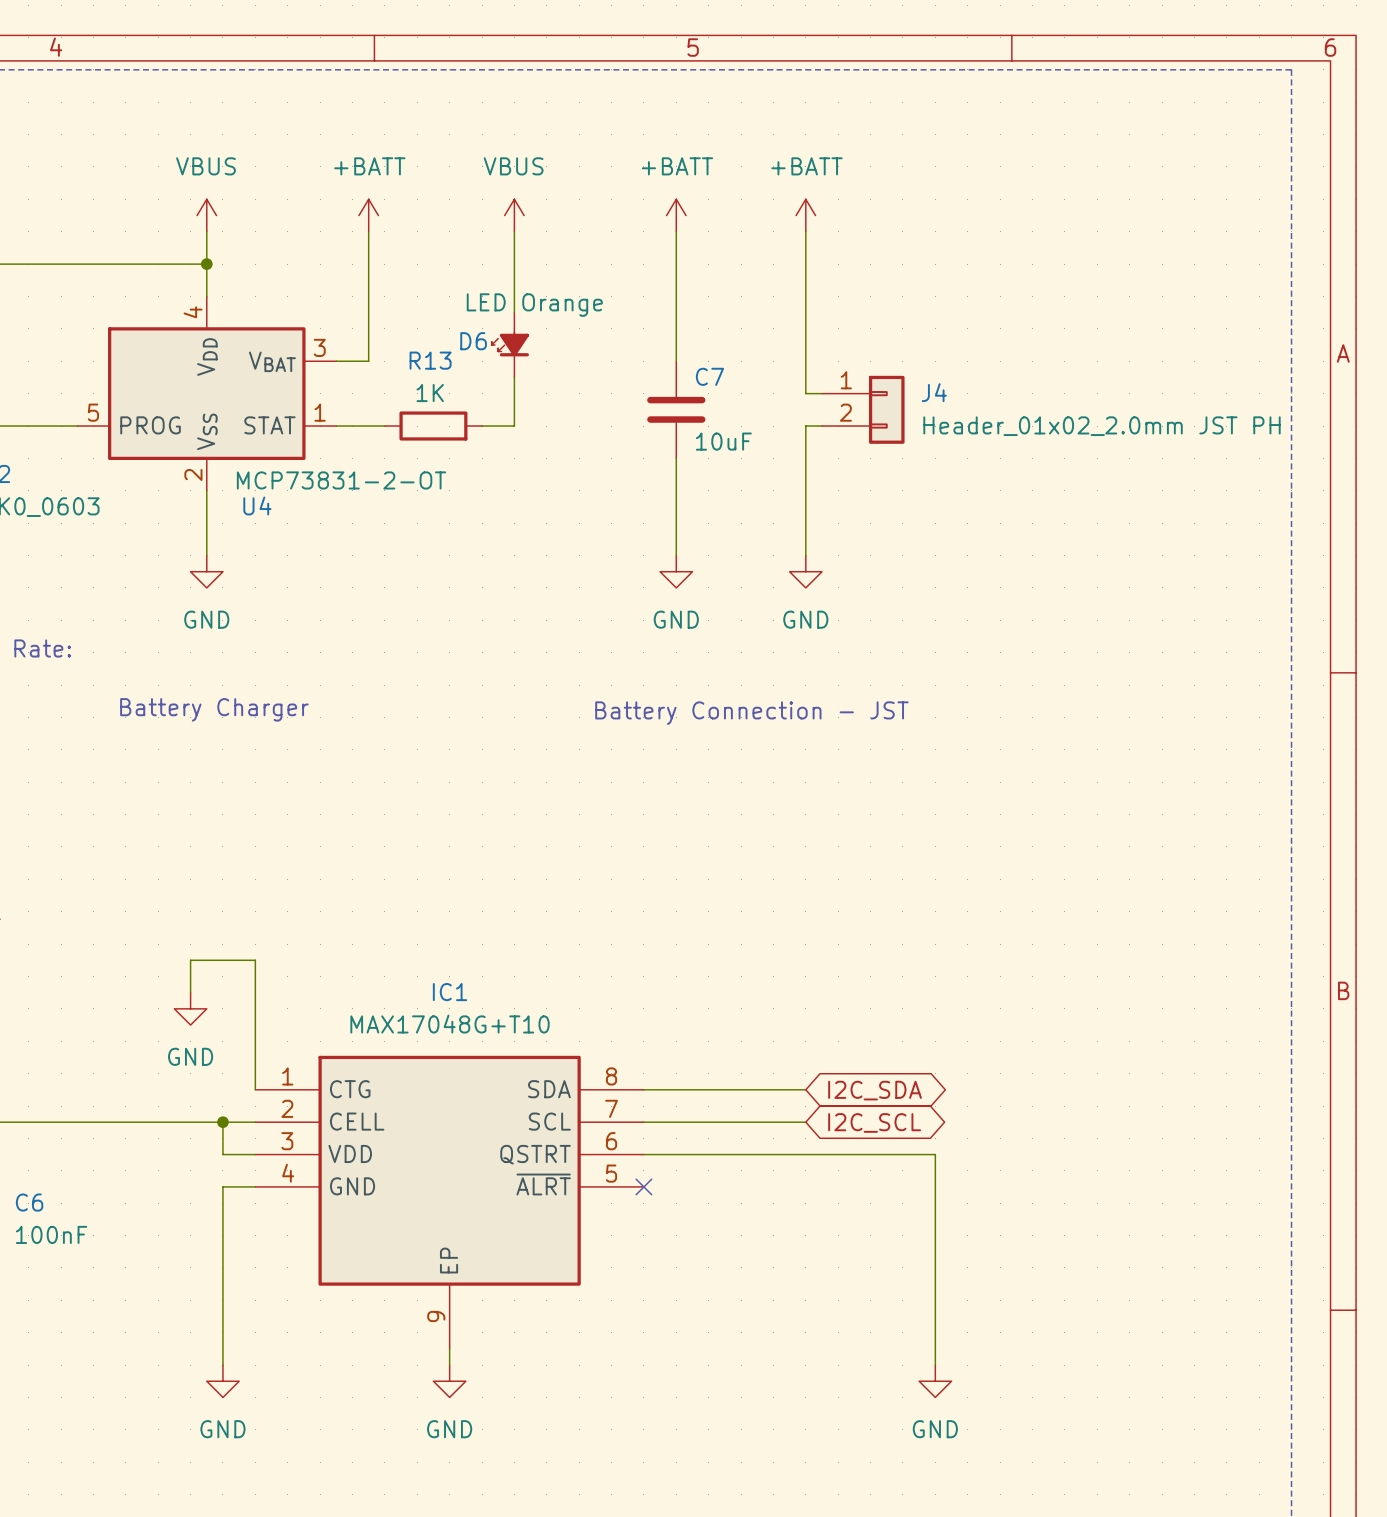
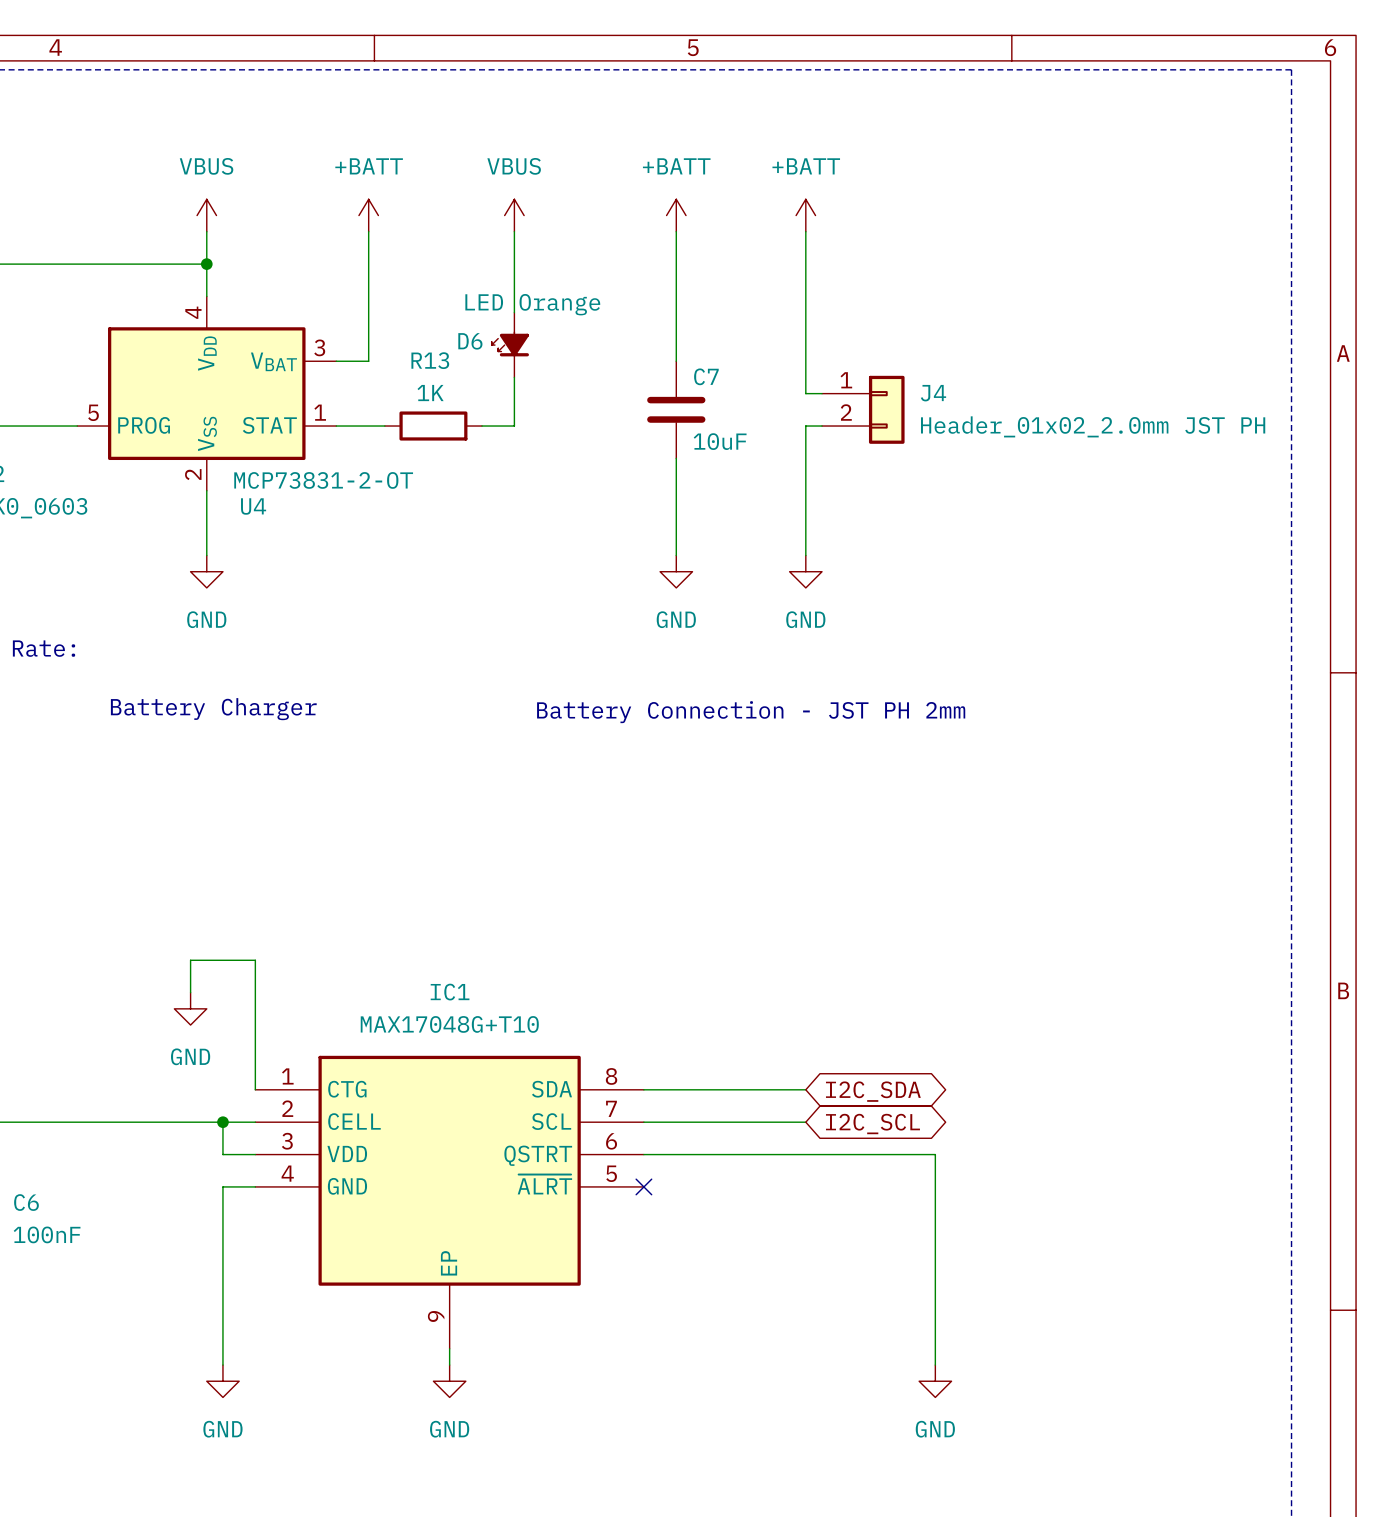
text: Battery Connection - JST (751, 713) -> Battery Connection - JST PH 2mm (751, 712)

